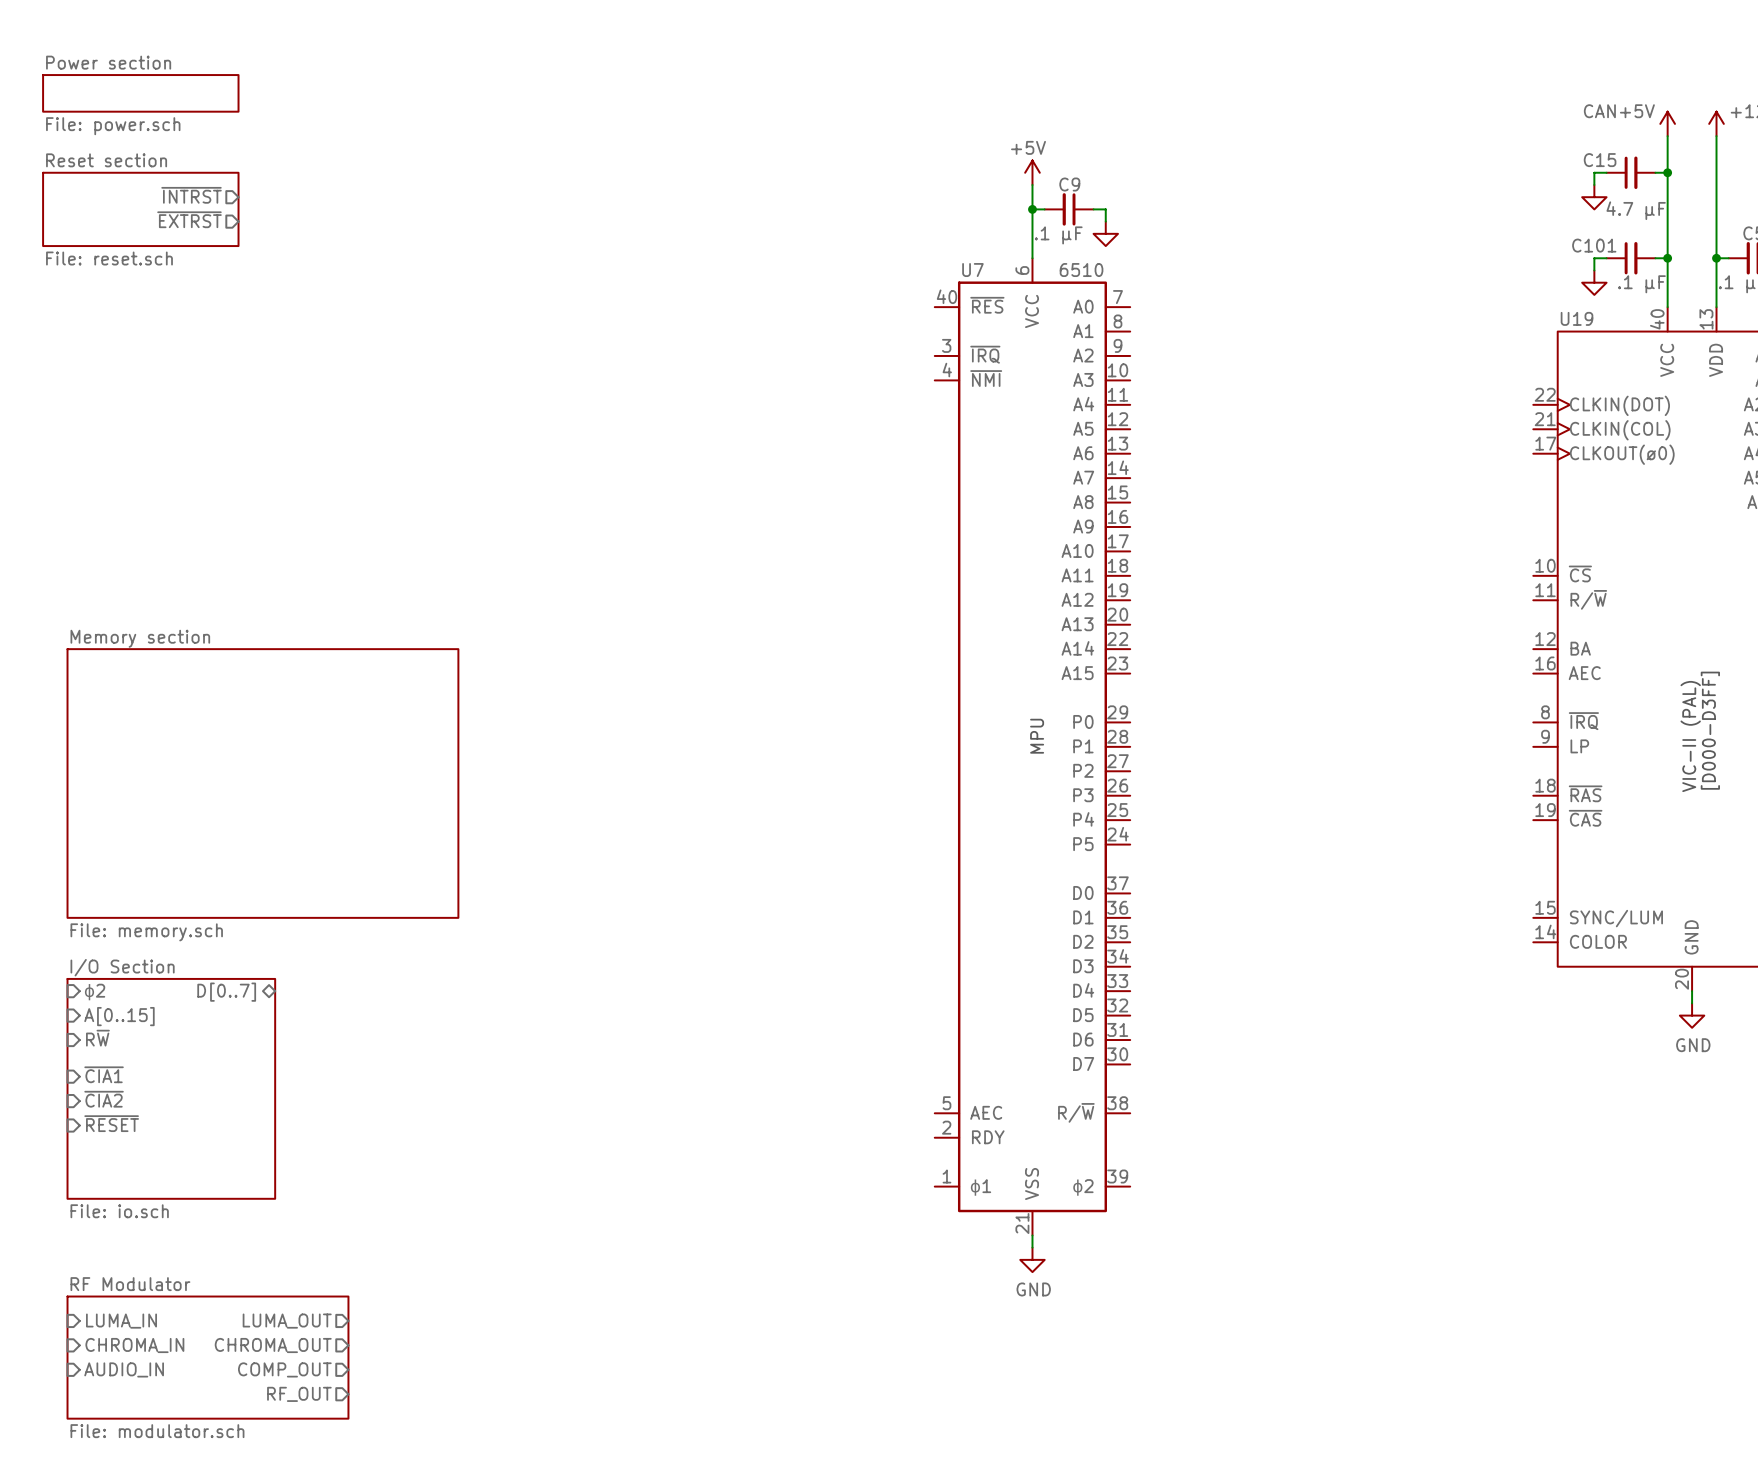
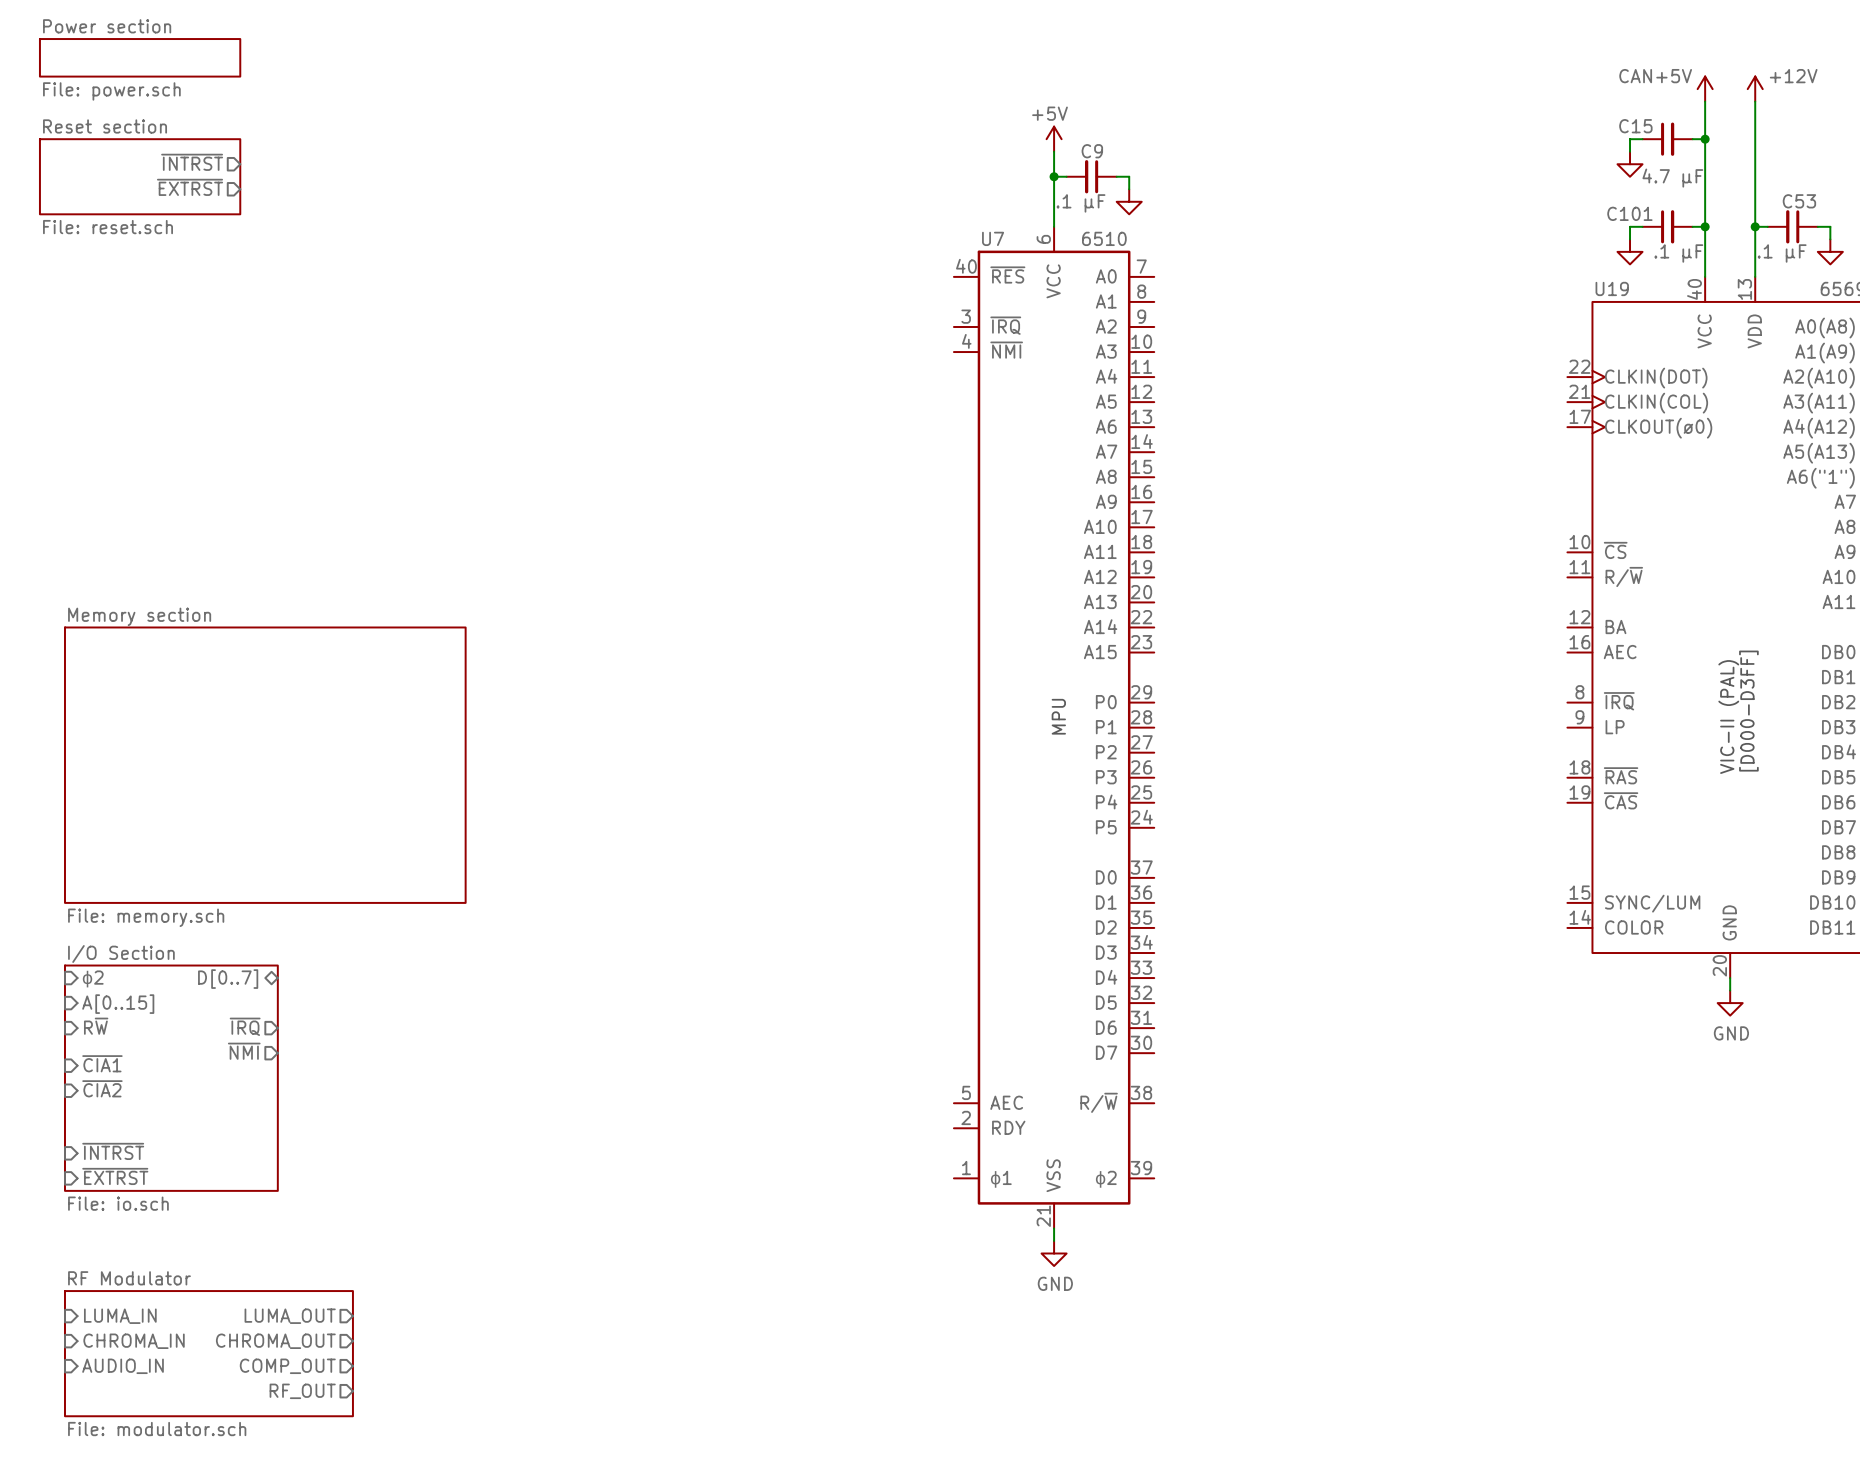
sheet pin: none -> ~{IRQ} (245, 1026)
sheet pin: none -> ~{NMI} (244, 1051)
sheet pin: ~{RESET} (111, 1123) -> none
sheet pin: none -> ~{INTRST} (113, 1151)
sheet pin: none -> ~{EXTRST} (115, 1176)

